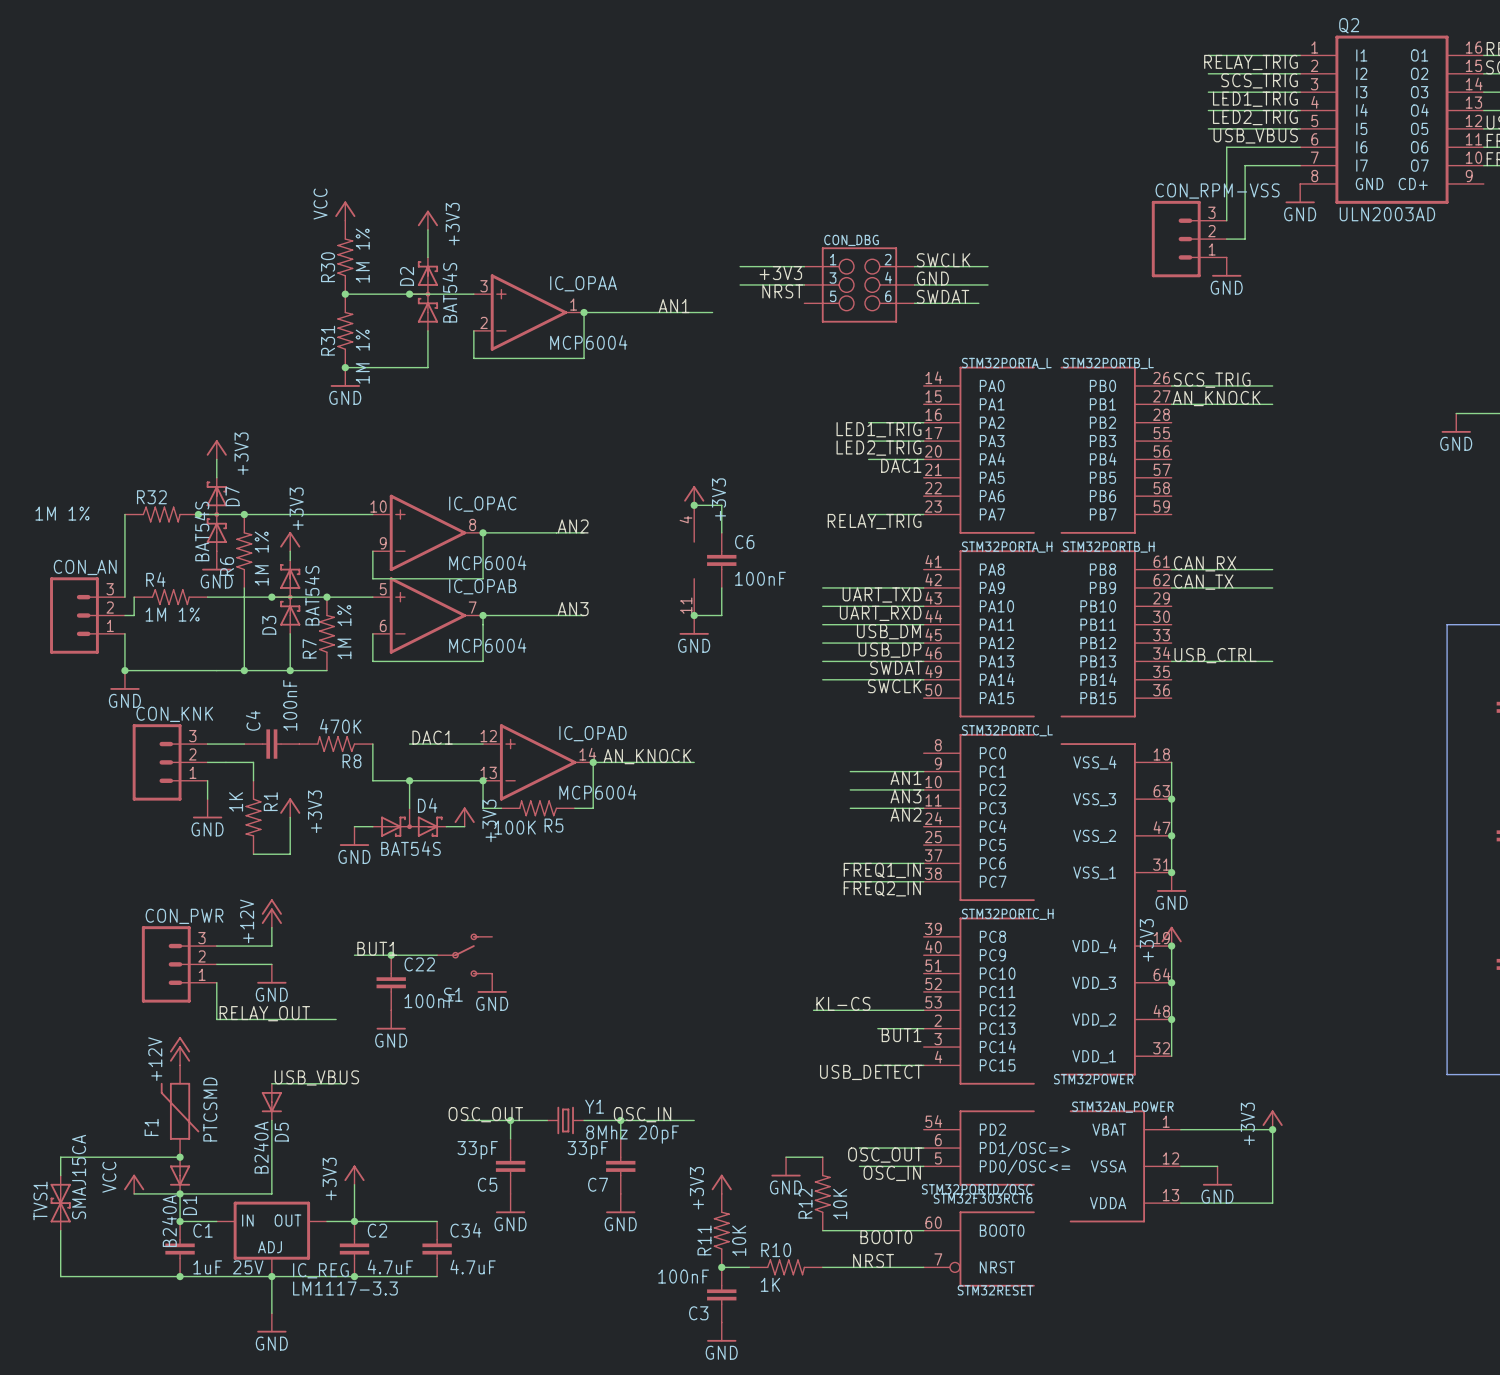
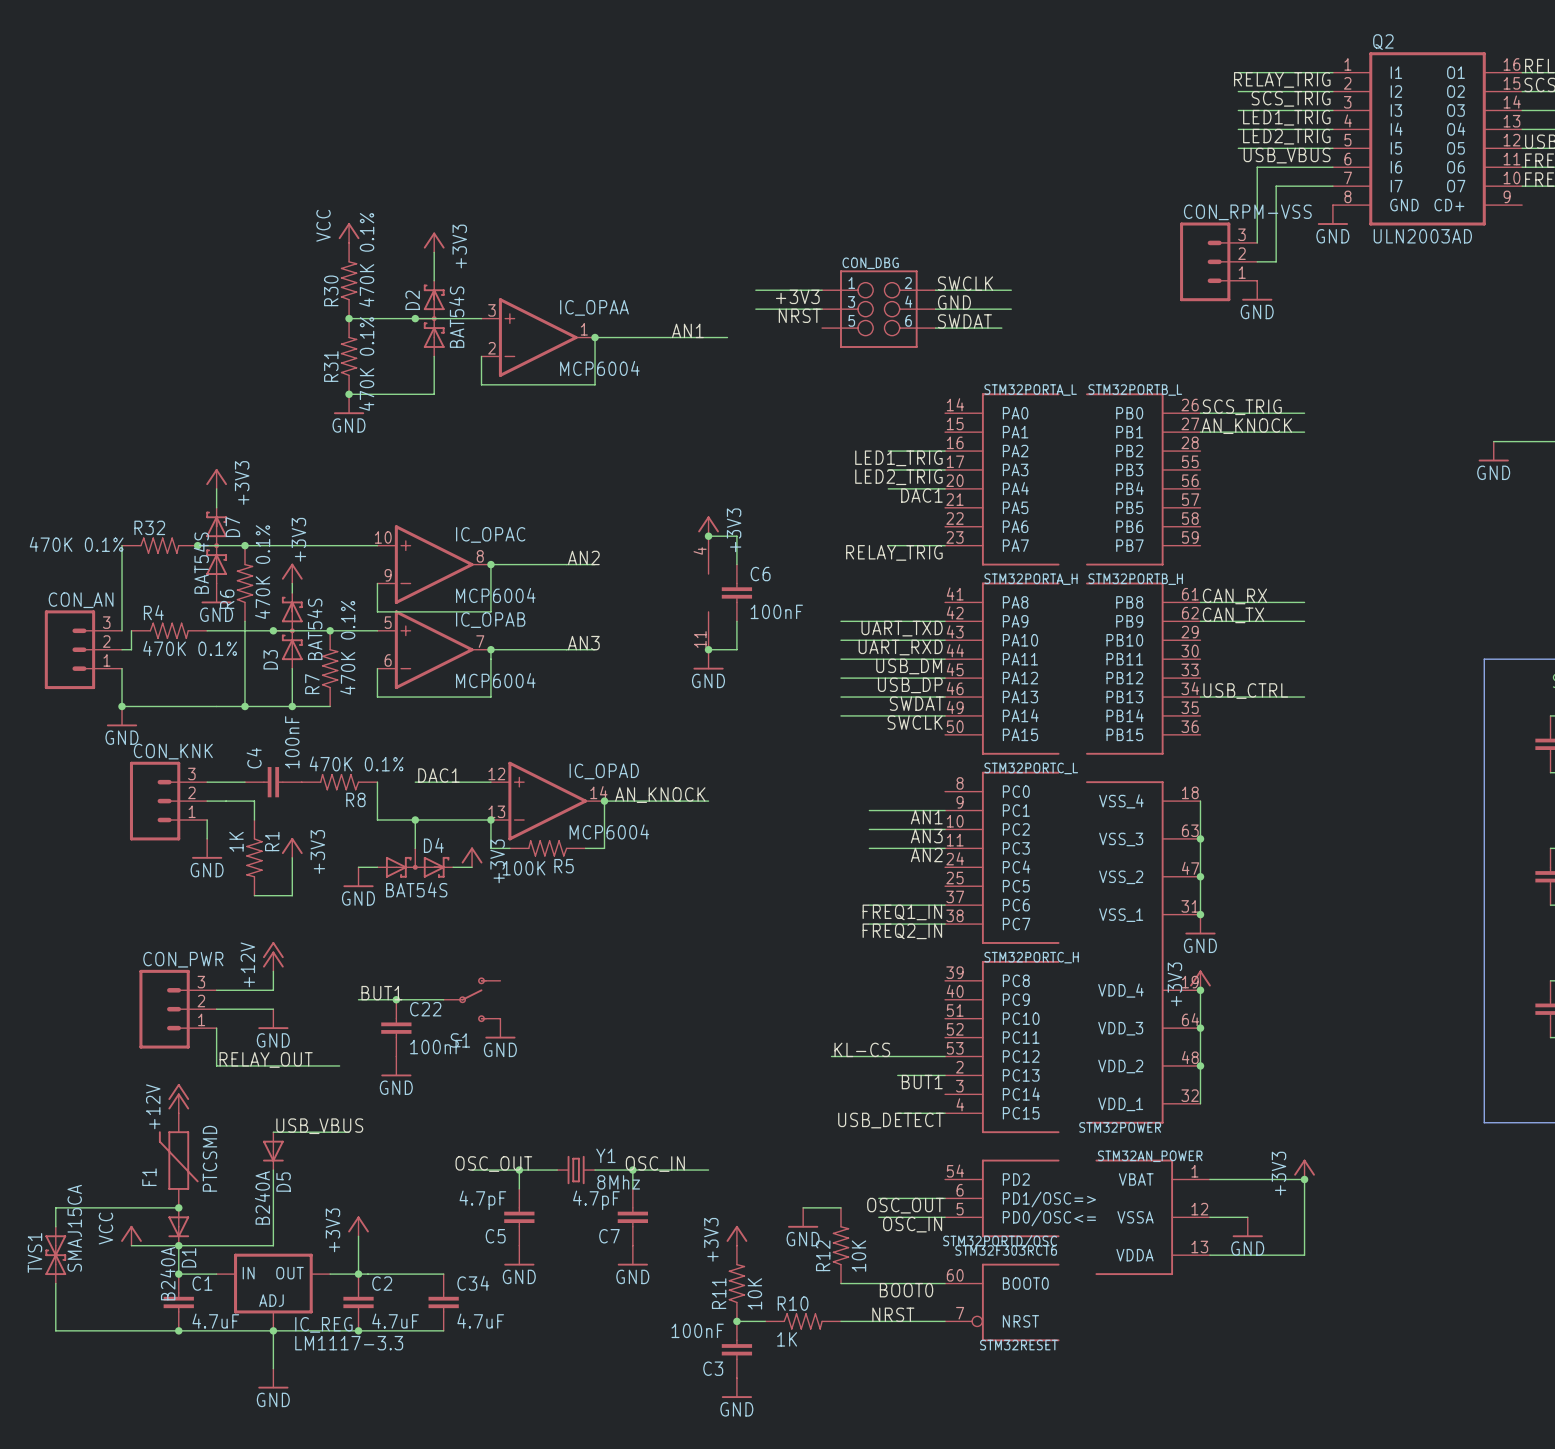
R30 value: 1M 1% (362, 255) -> 470K 0.1% (366, 259)
R31 value: 1M 1% (362, 356) -> 470K 0.1% (366, 363)
R32 value: 1M 1% (62, 513) -> 470K 0.1% (76, 544)
R6 value: 1M 1% (261, 558) -> 470K 0.1% (262, 572)
R4 value: 1M 1% (172, 614) -> 470K 0.1% (190, 648)
R7 value: 1M 1% (344, 632) -> 470K 0.1% (347, 647)
R8 value: 470K (340, 726) -> 470K 0.1% (356, 763)
Y1 value: 8Mhz 20pF (632, 1134) -> 8Mhz (618, 1182)
C5 value: 33pF (477, 1150) -> 4.7pF (482, 1200)
C7 value: 33pF (587, 1150) -> 4.7pF (596, 1200)
C1 value: 1uF 25V (228, 1267) -> 4.7uF (215, 1321)

